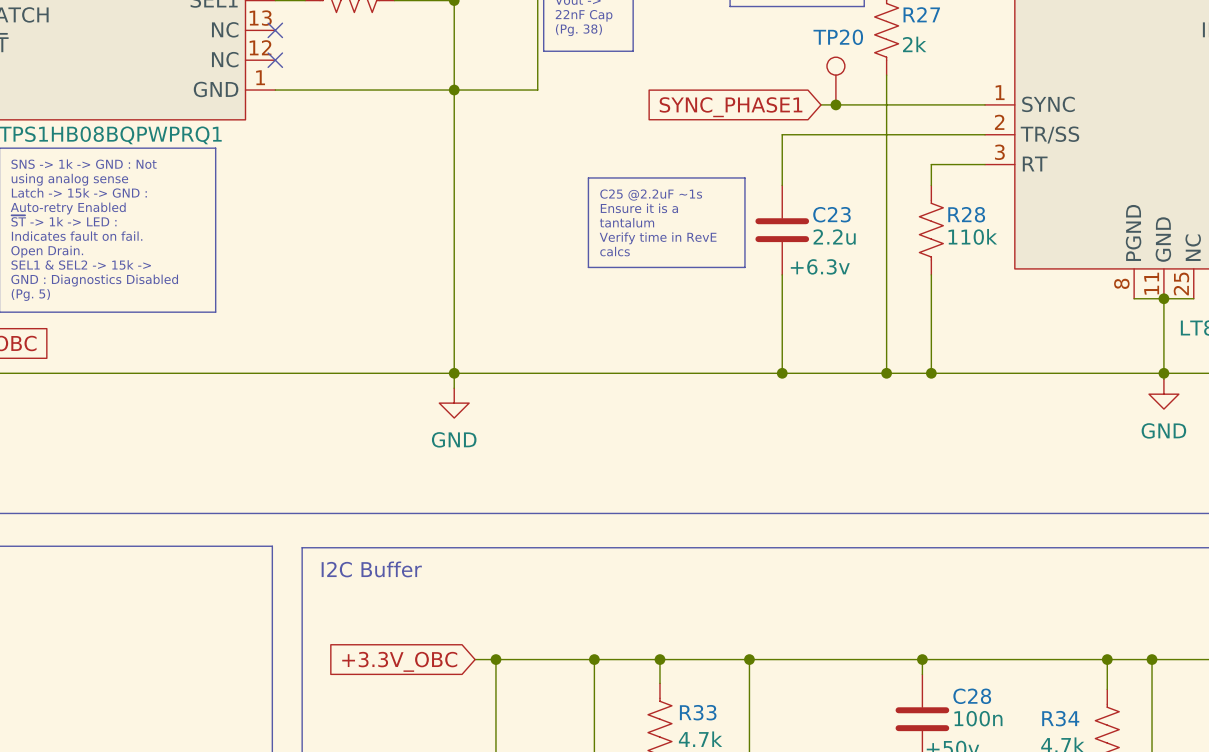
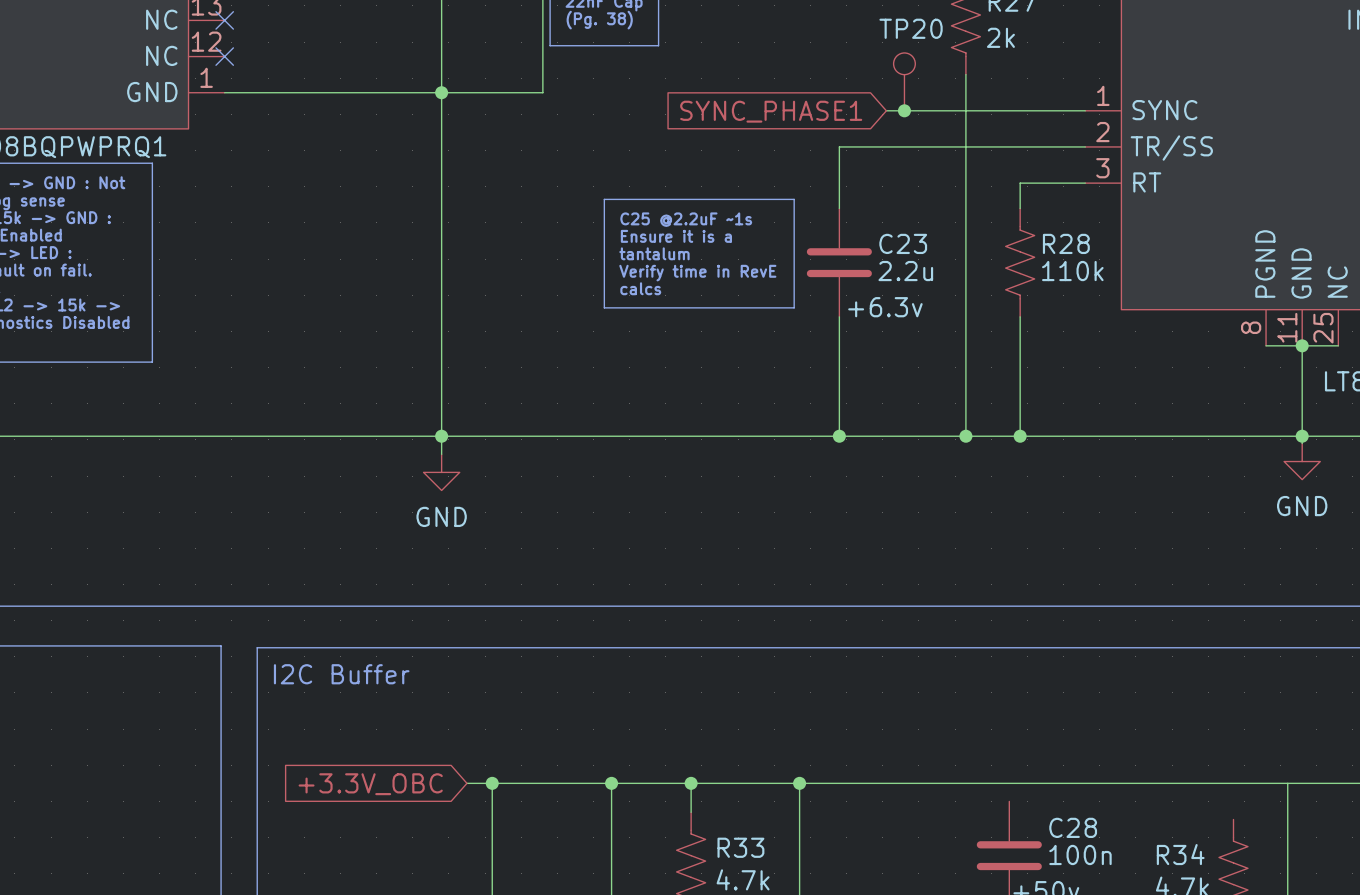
wire: (922, 659) (922, 674) -> none
junction: (922, 659) -> none
wire: (1107, 659) (1107, 689) -> none
junction: (1107, 659) -> none
junction: (1152, 659) -> none

